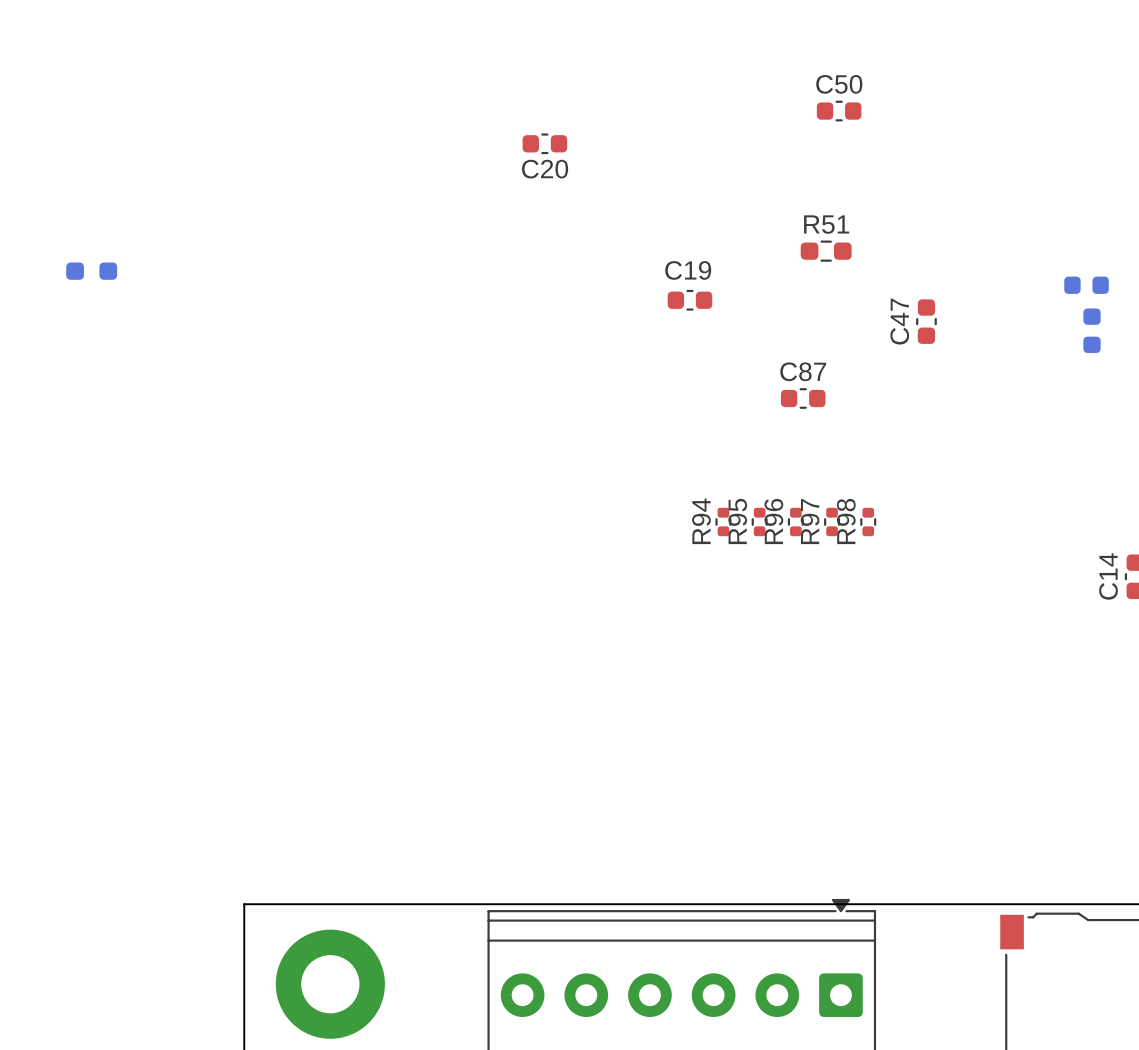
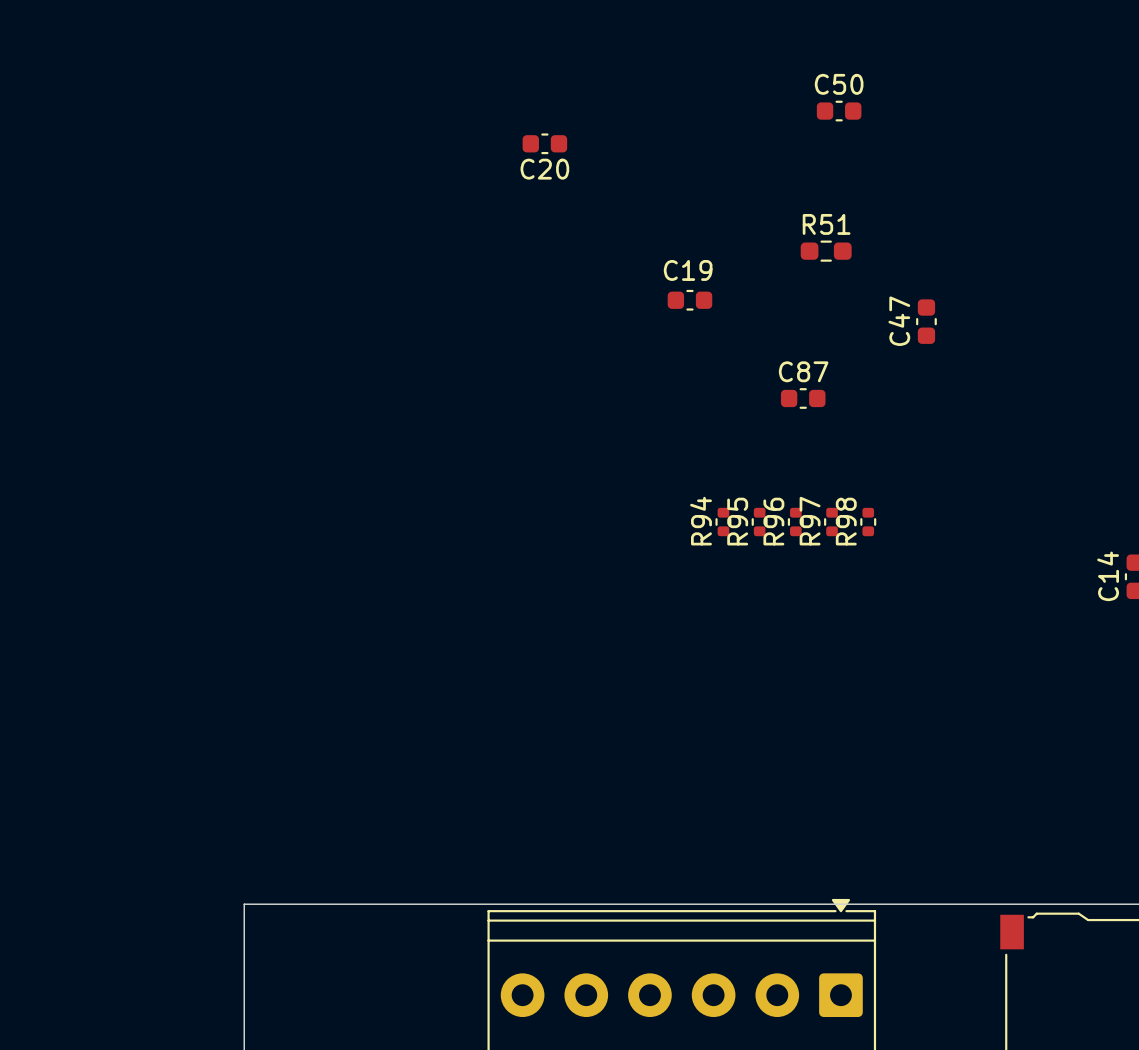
part: (91, 271) -> none
part: (1086, 285) -> none
part: (1092, 330) -> none
part: (330, 984) -> none

